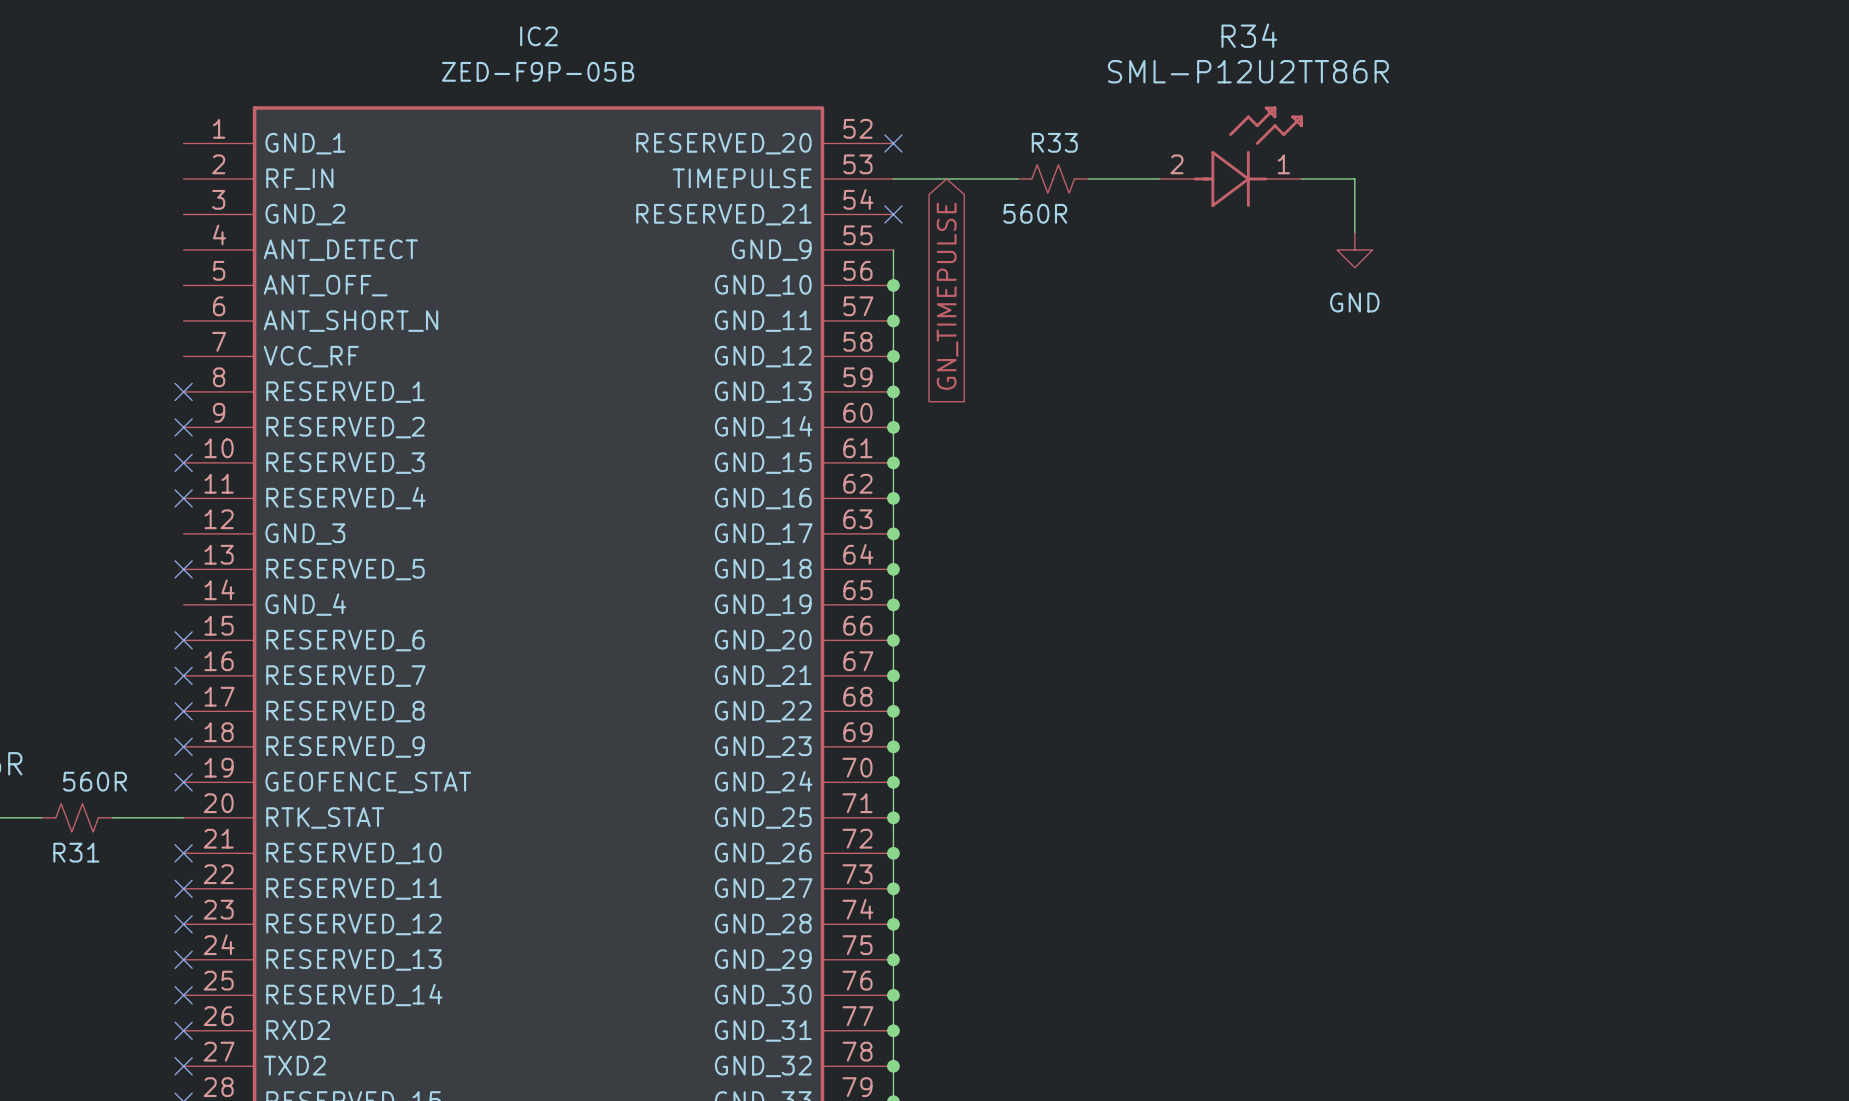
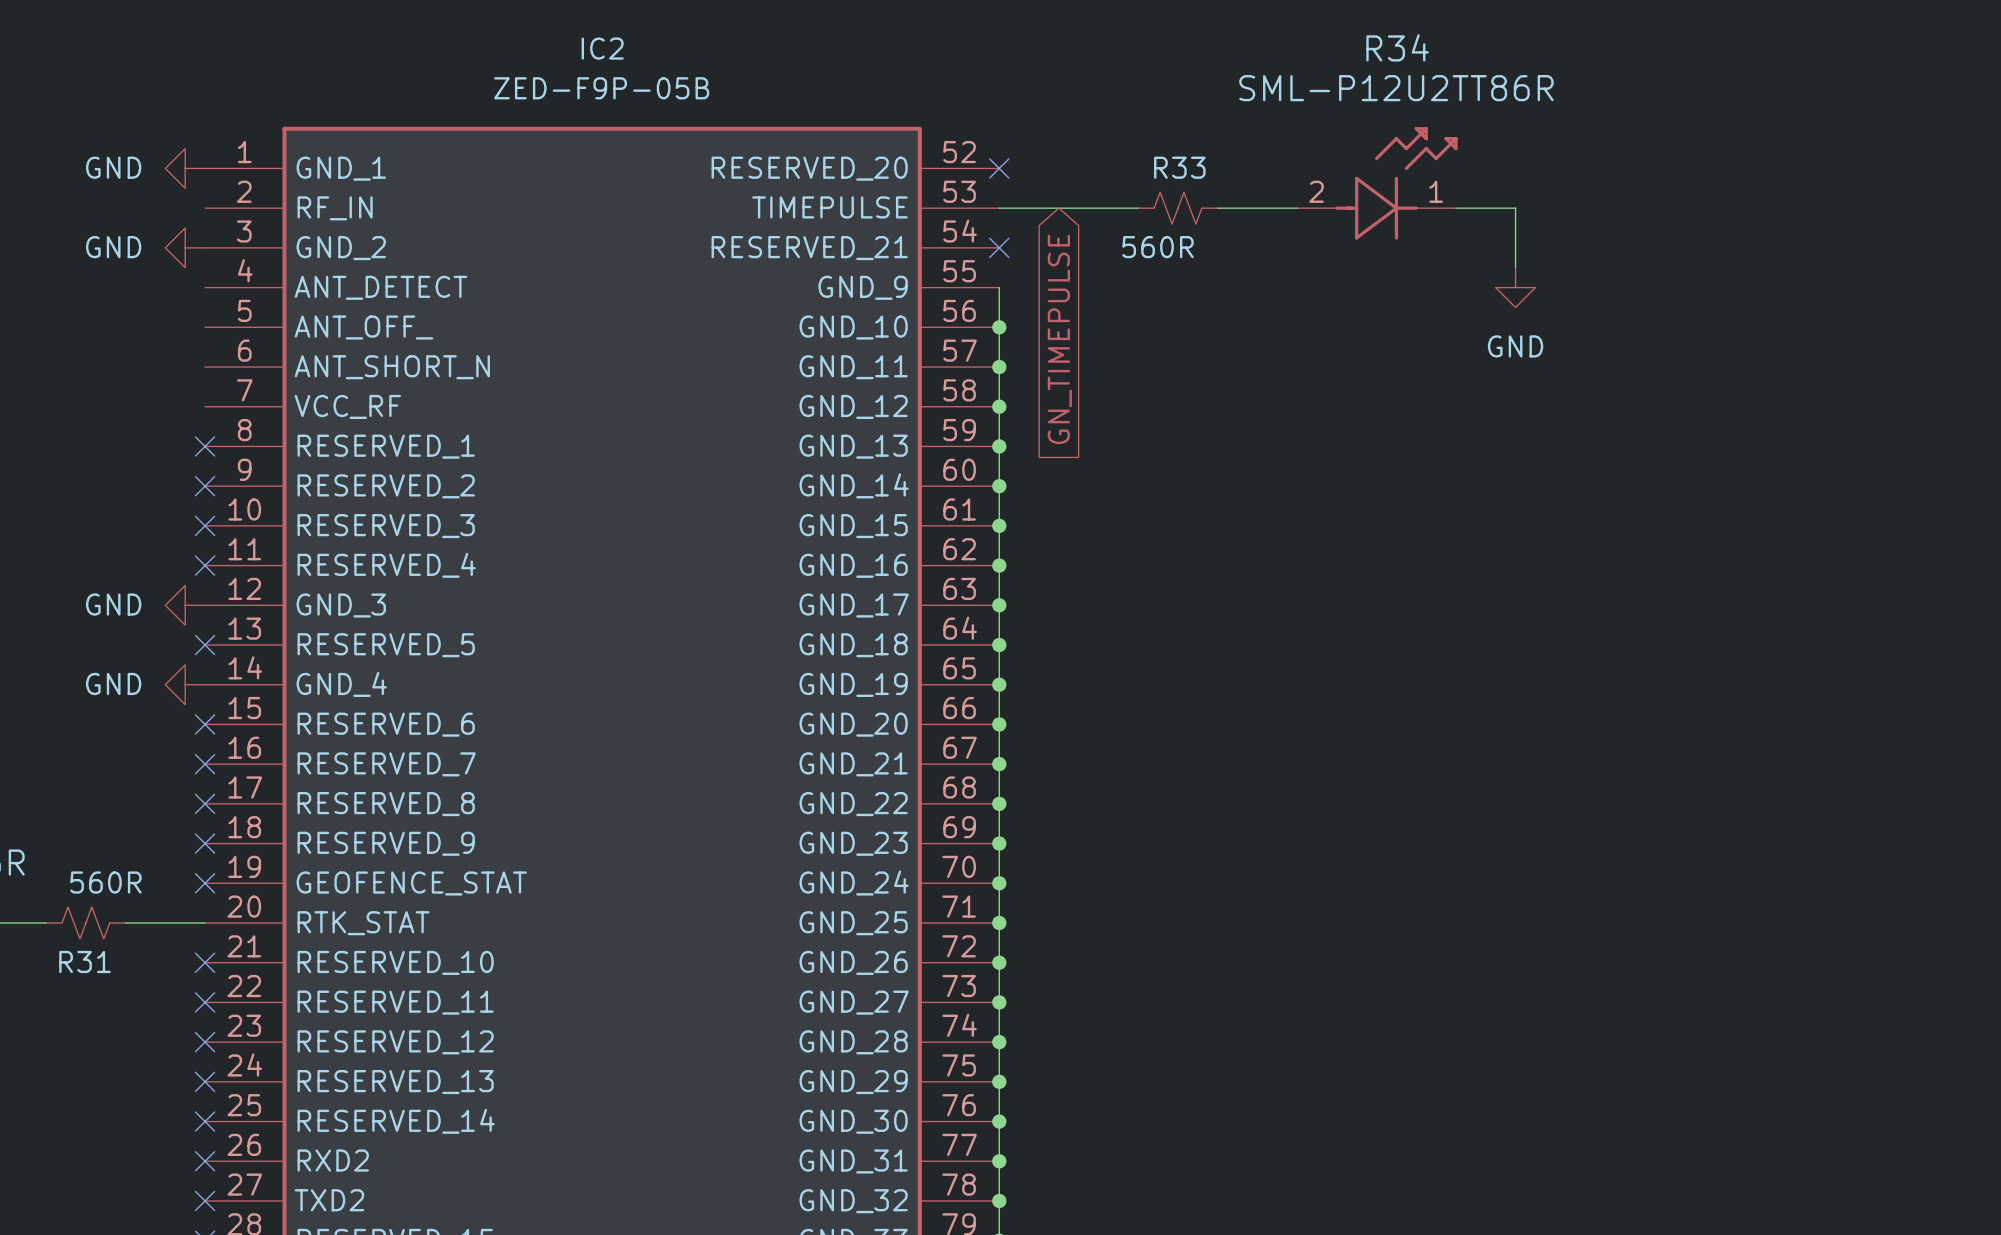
power symbol: none -> GND (185, 168)
power symbol: none -> GND (185, 247)
power symbol: none -> GND (185, 605)
power symbol: none -> GND (185, 684)

